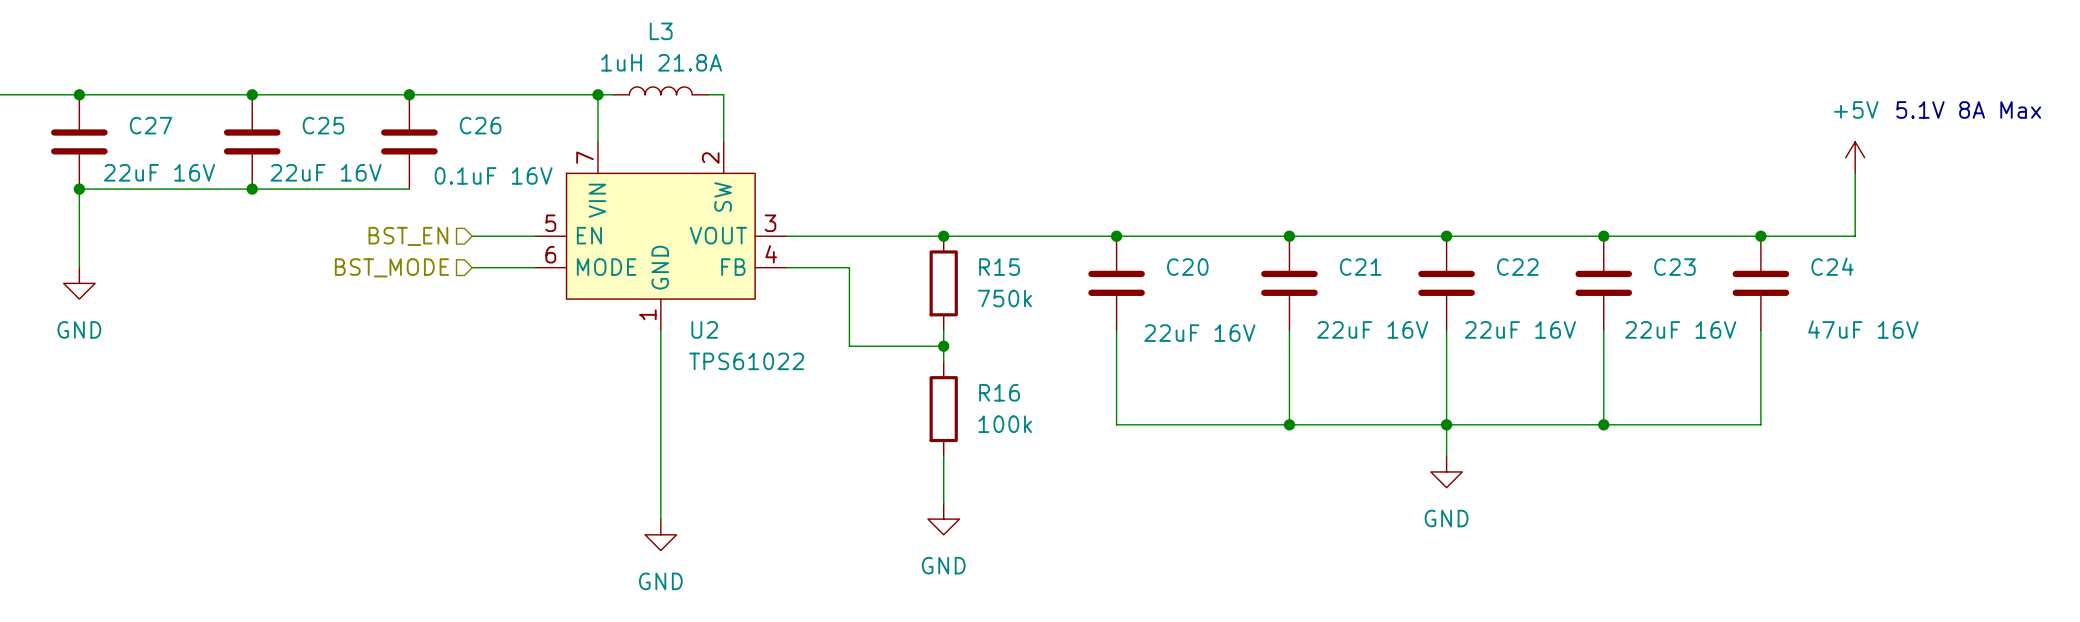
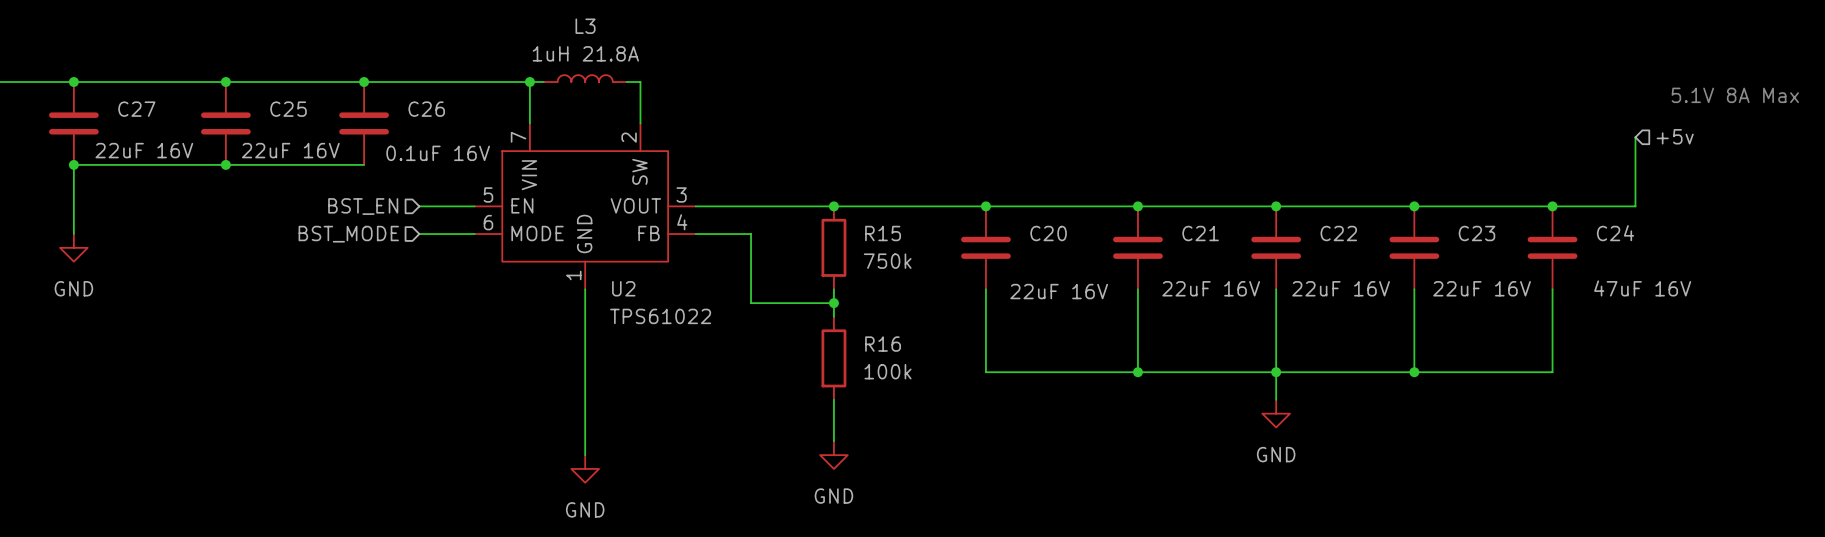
power symbol: +5V (1855, 157) -> none
hierarchical label: none -> +5v (1675, 136)

